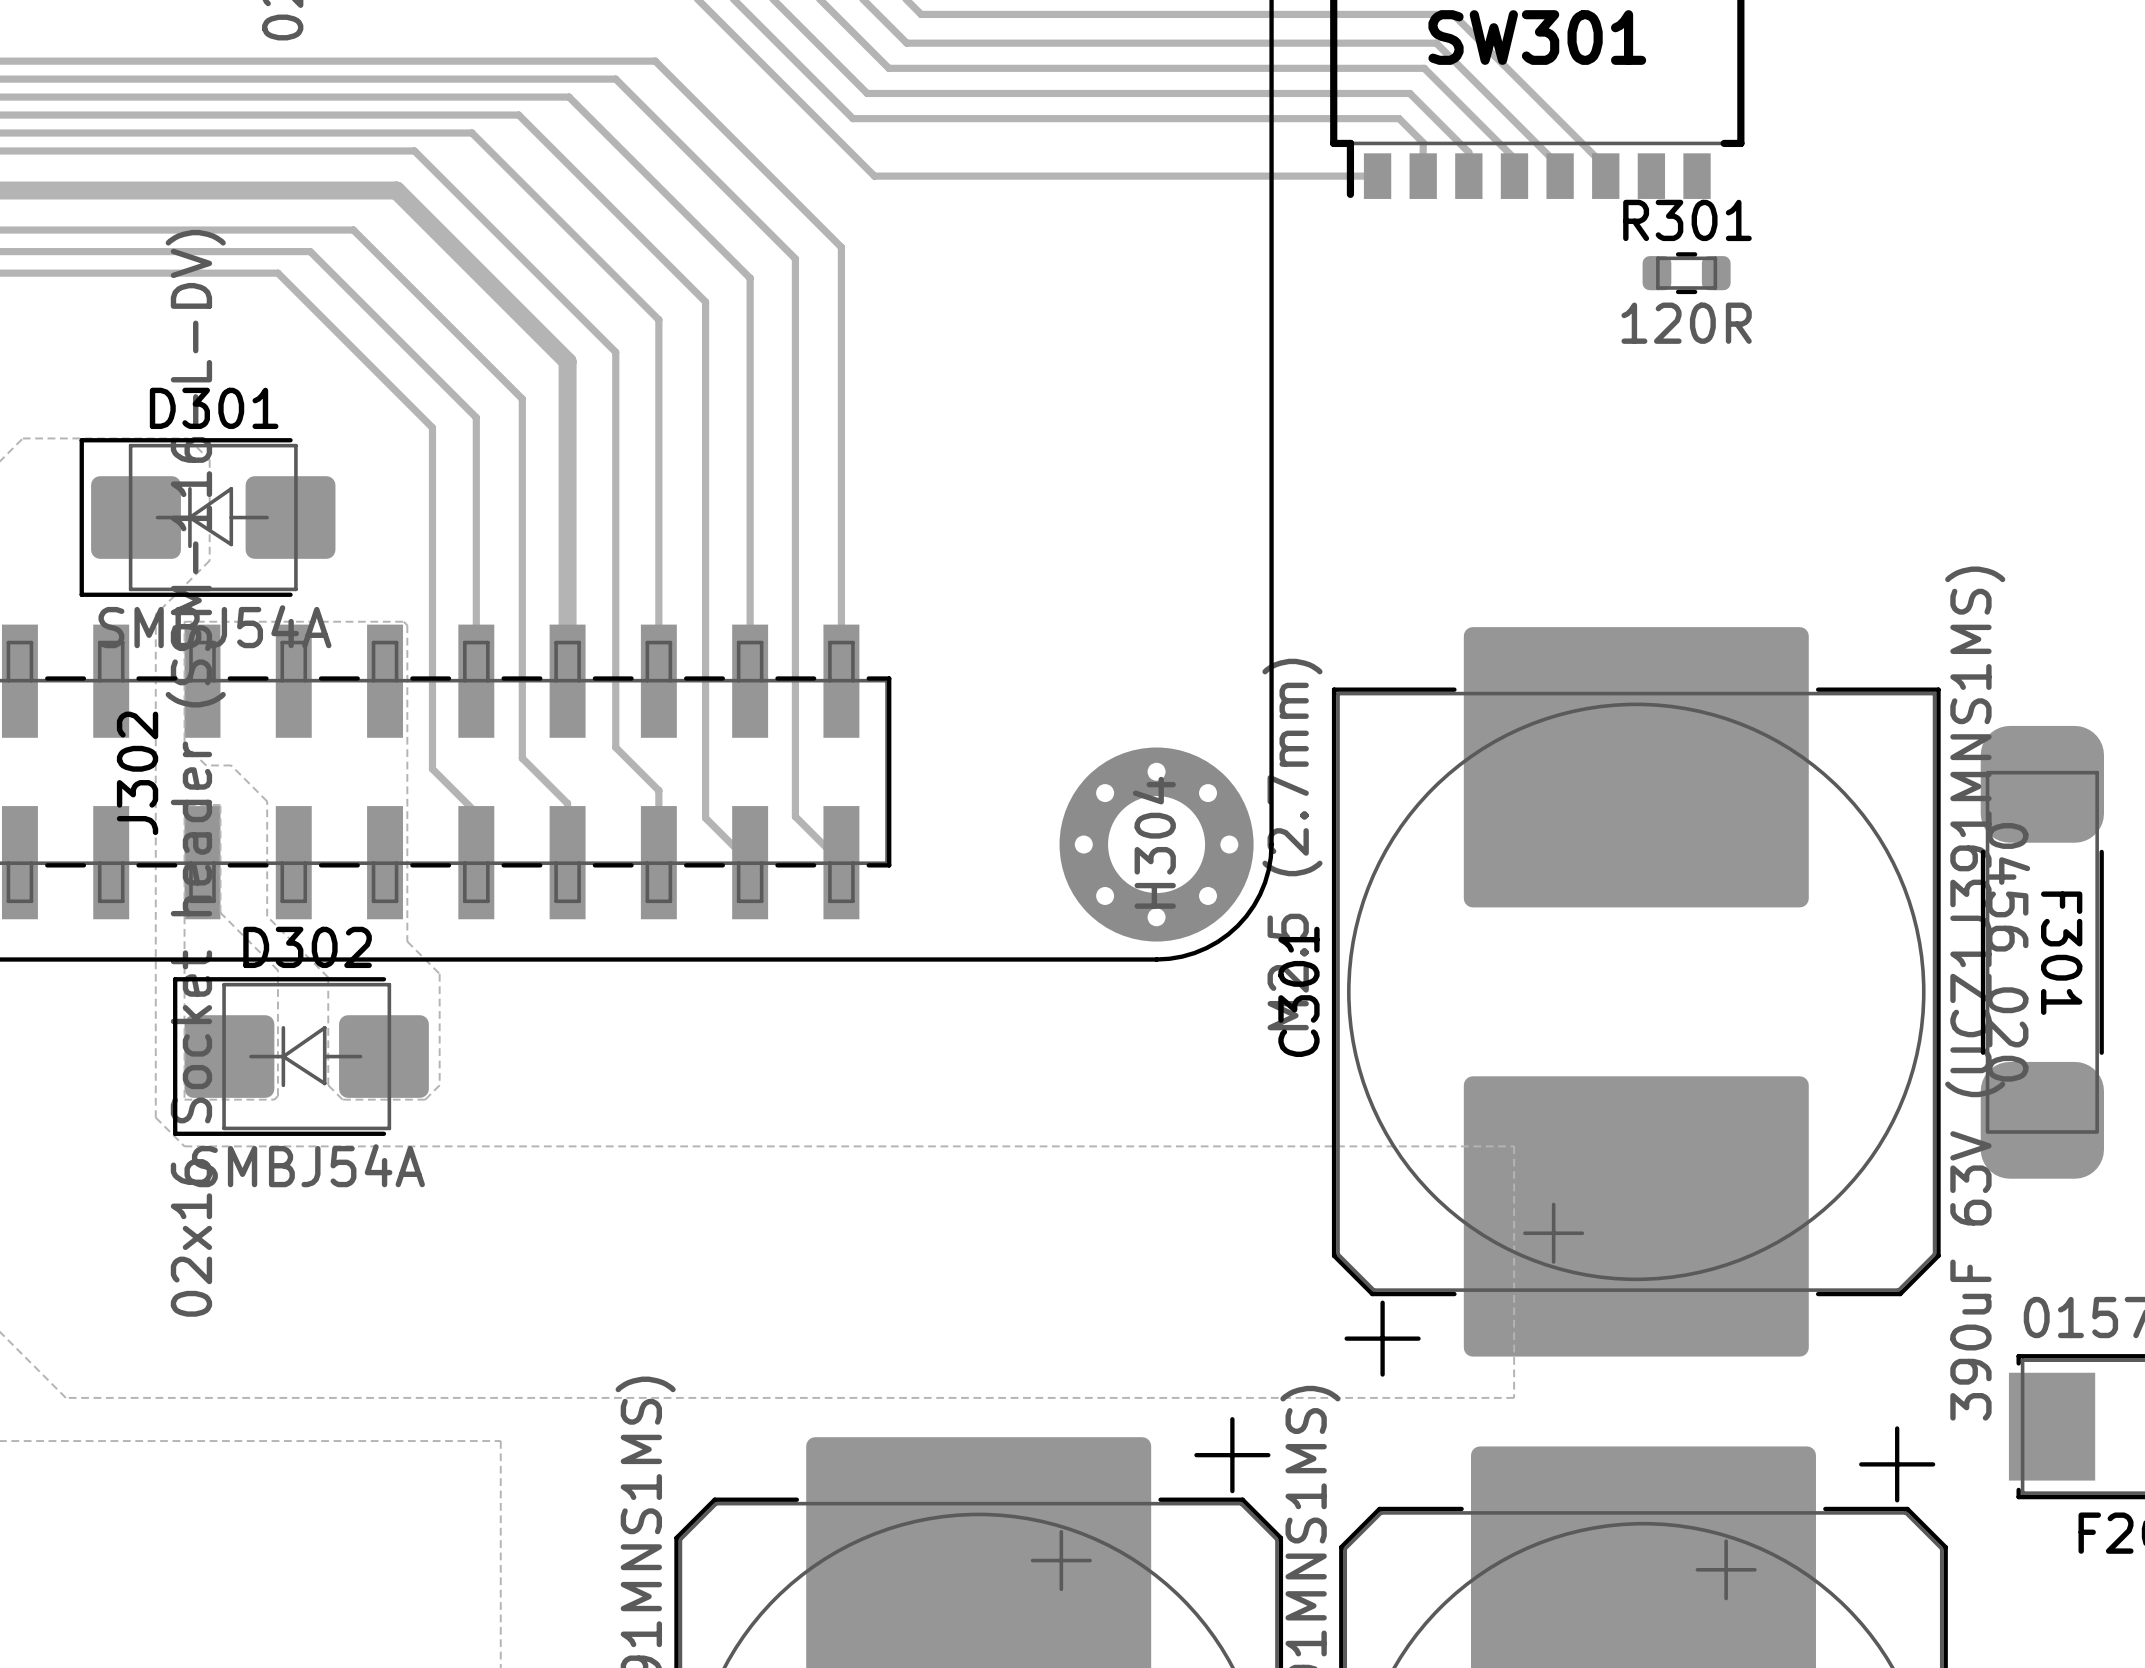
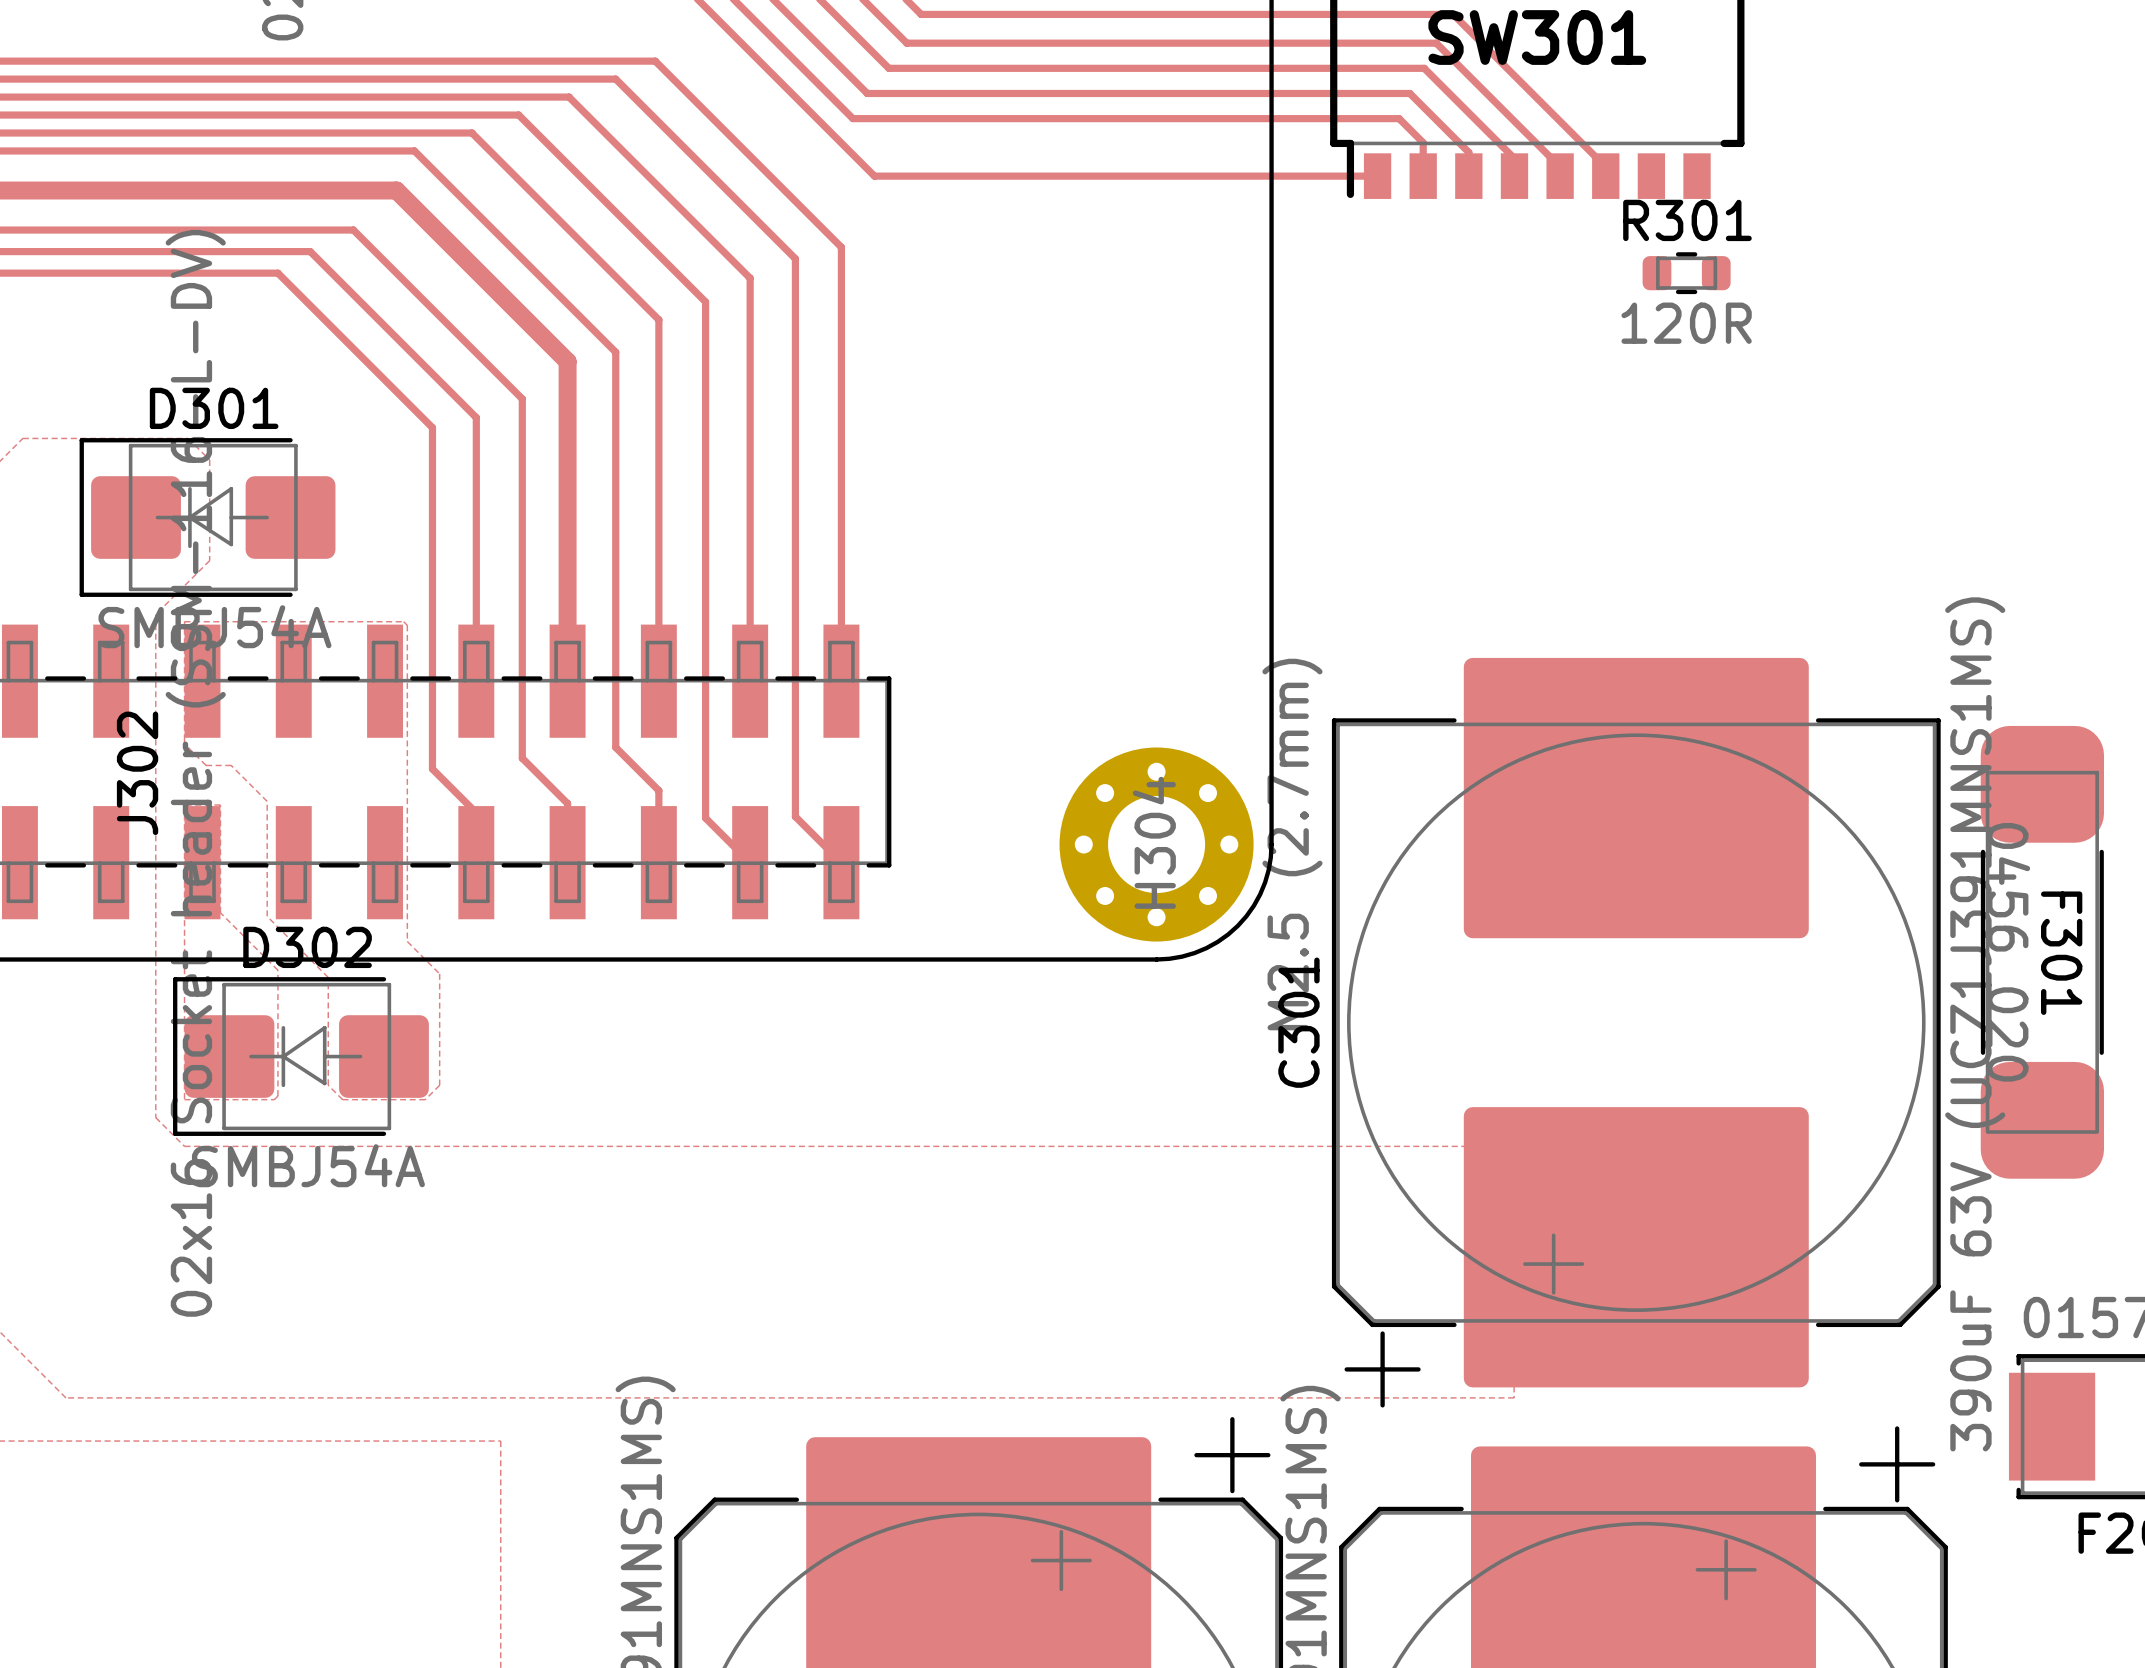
C301 position: (1636, 1001) -> (1636, 1032)

